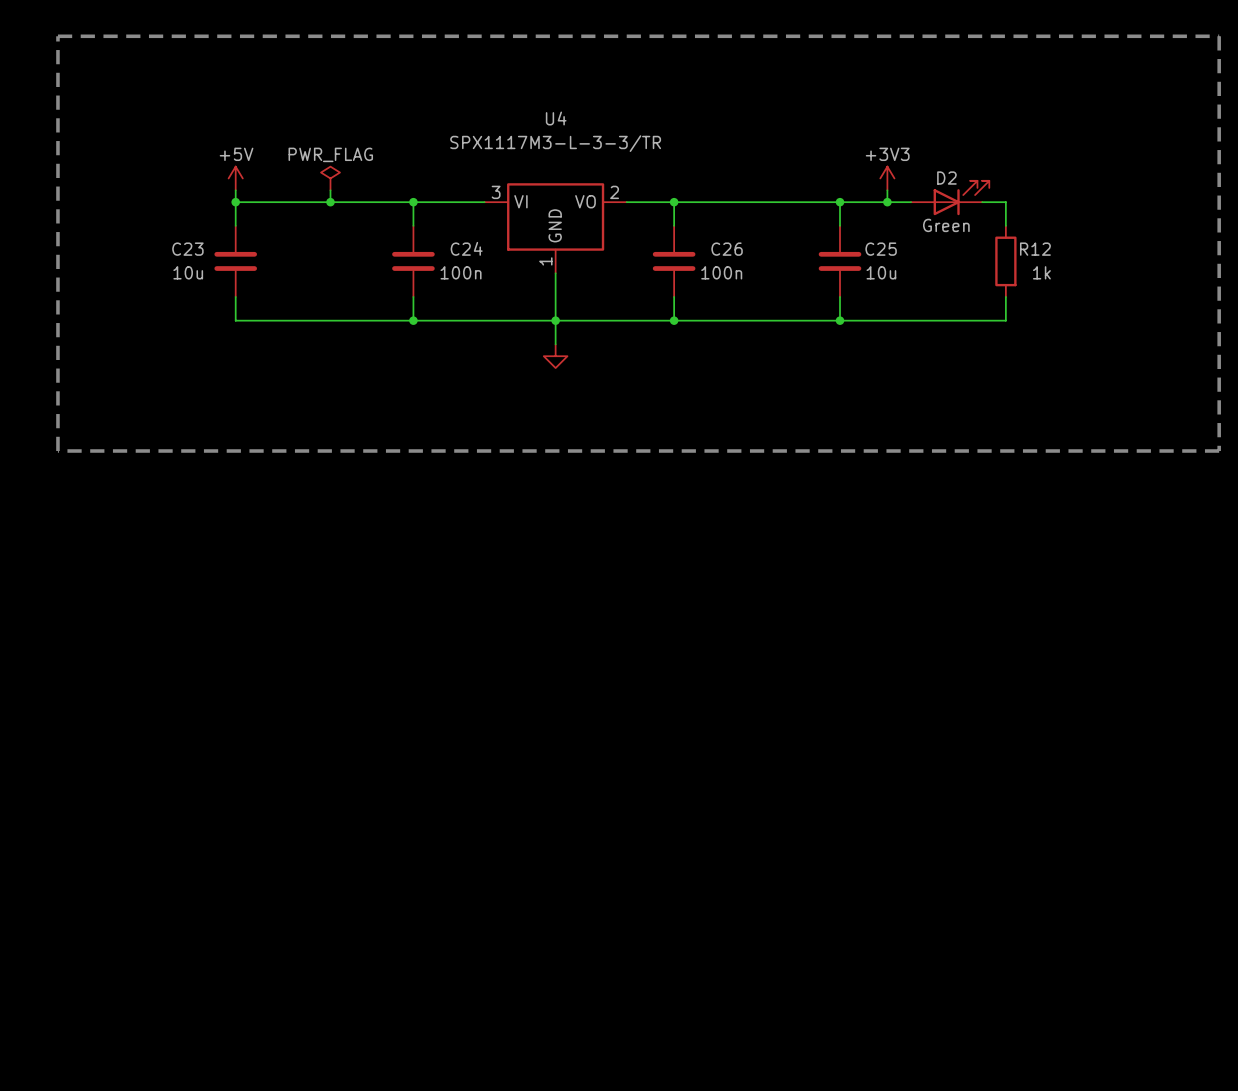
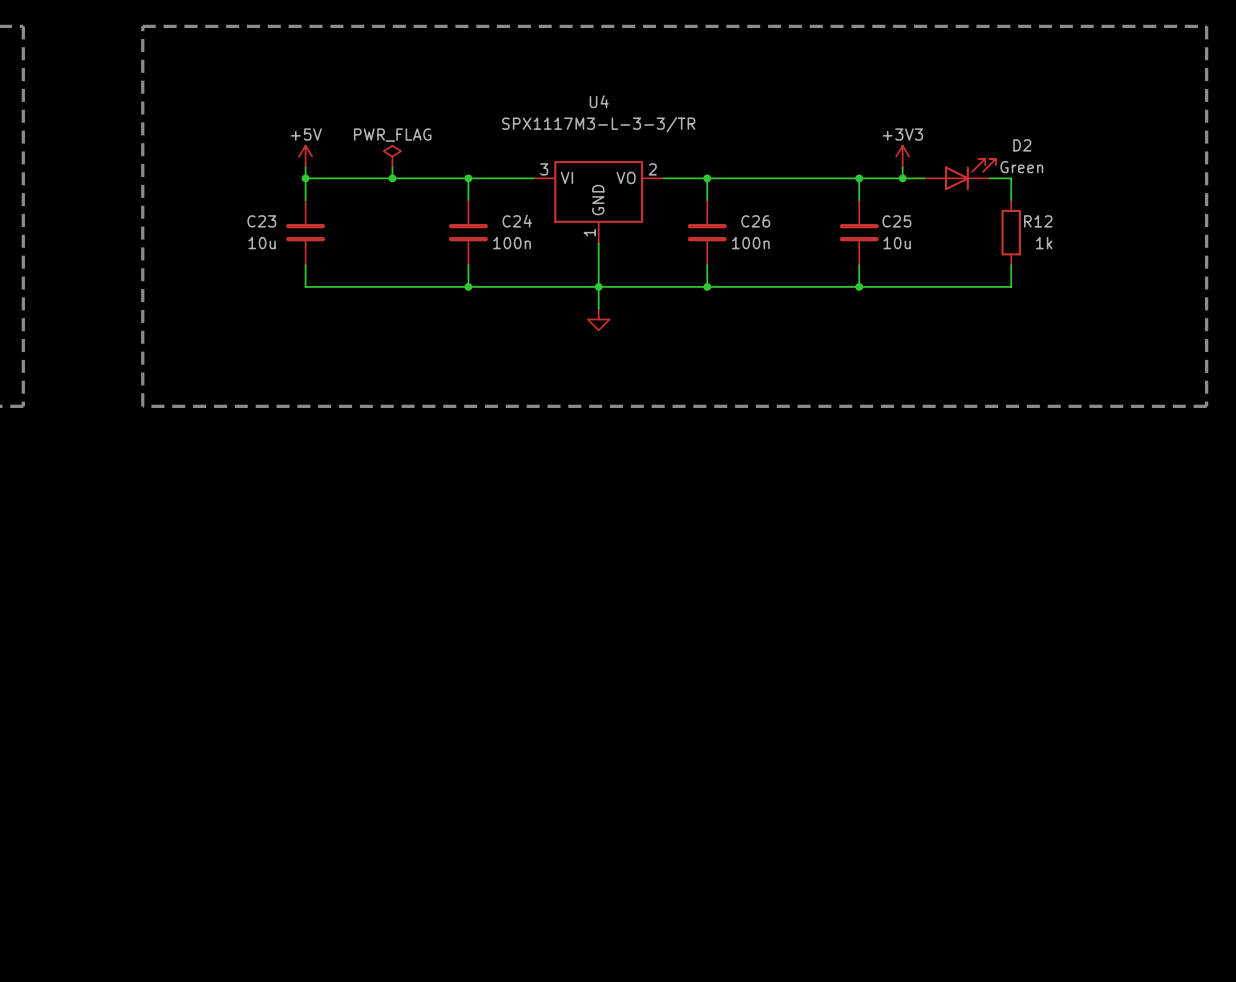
D2 name position: D2 (946, 178) -> D2 (1022, 145)
D2 value position: Green (946, 225) -> Green (1021, 167)

